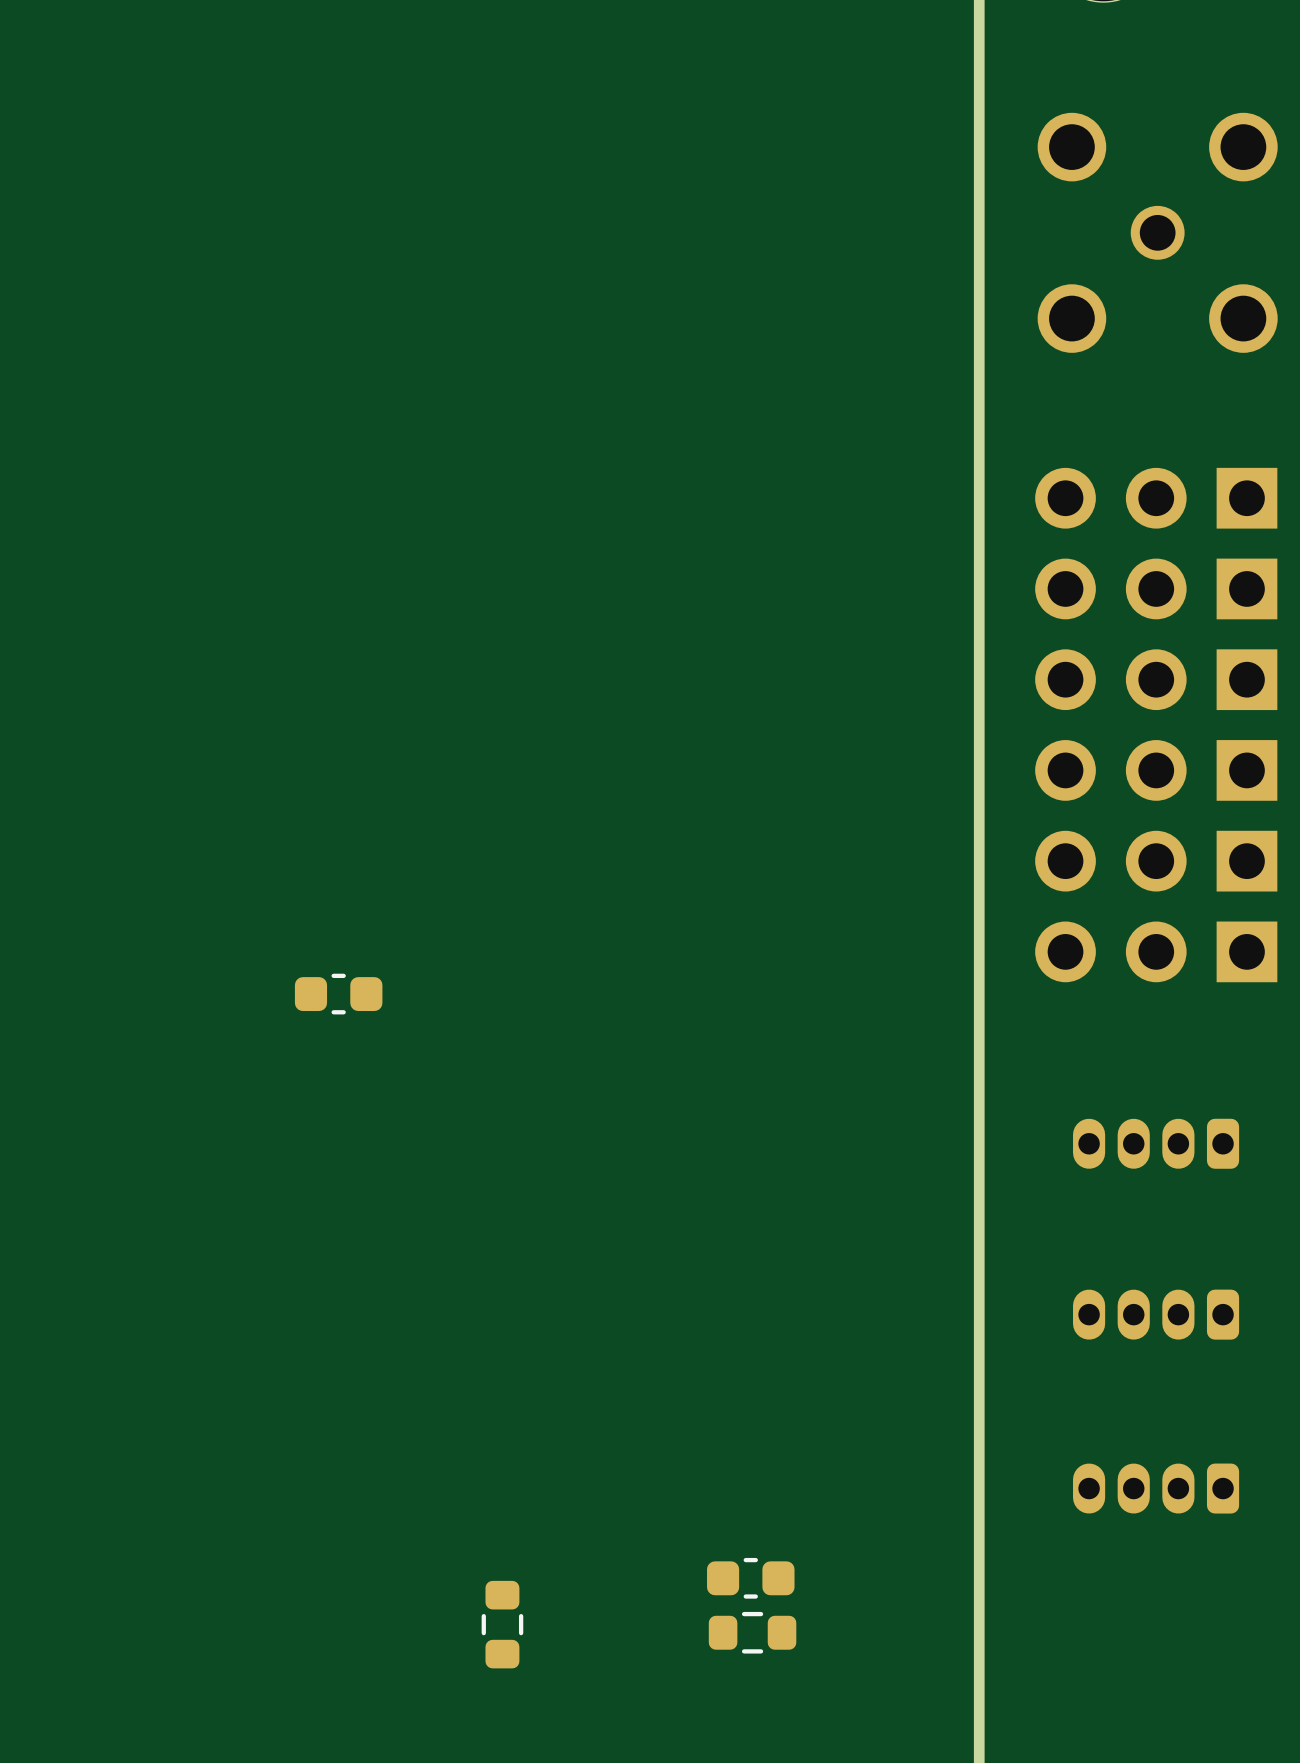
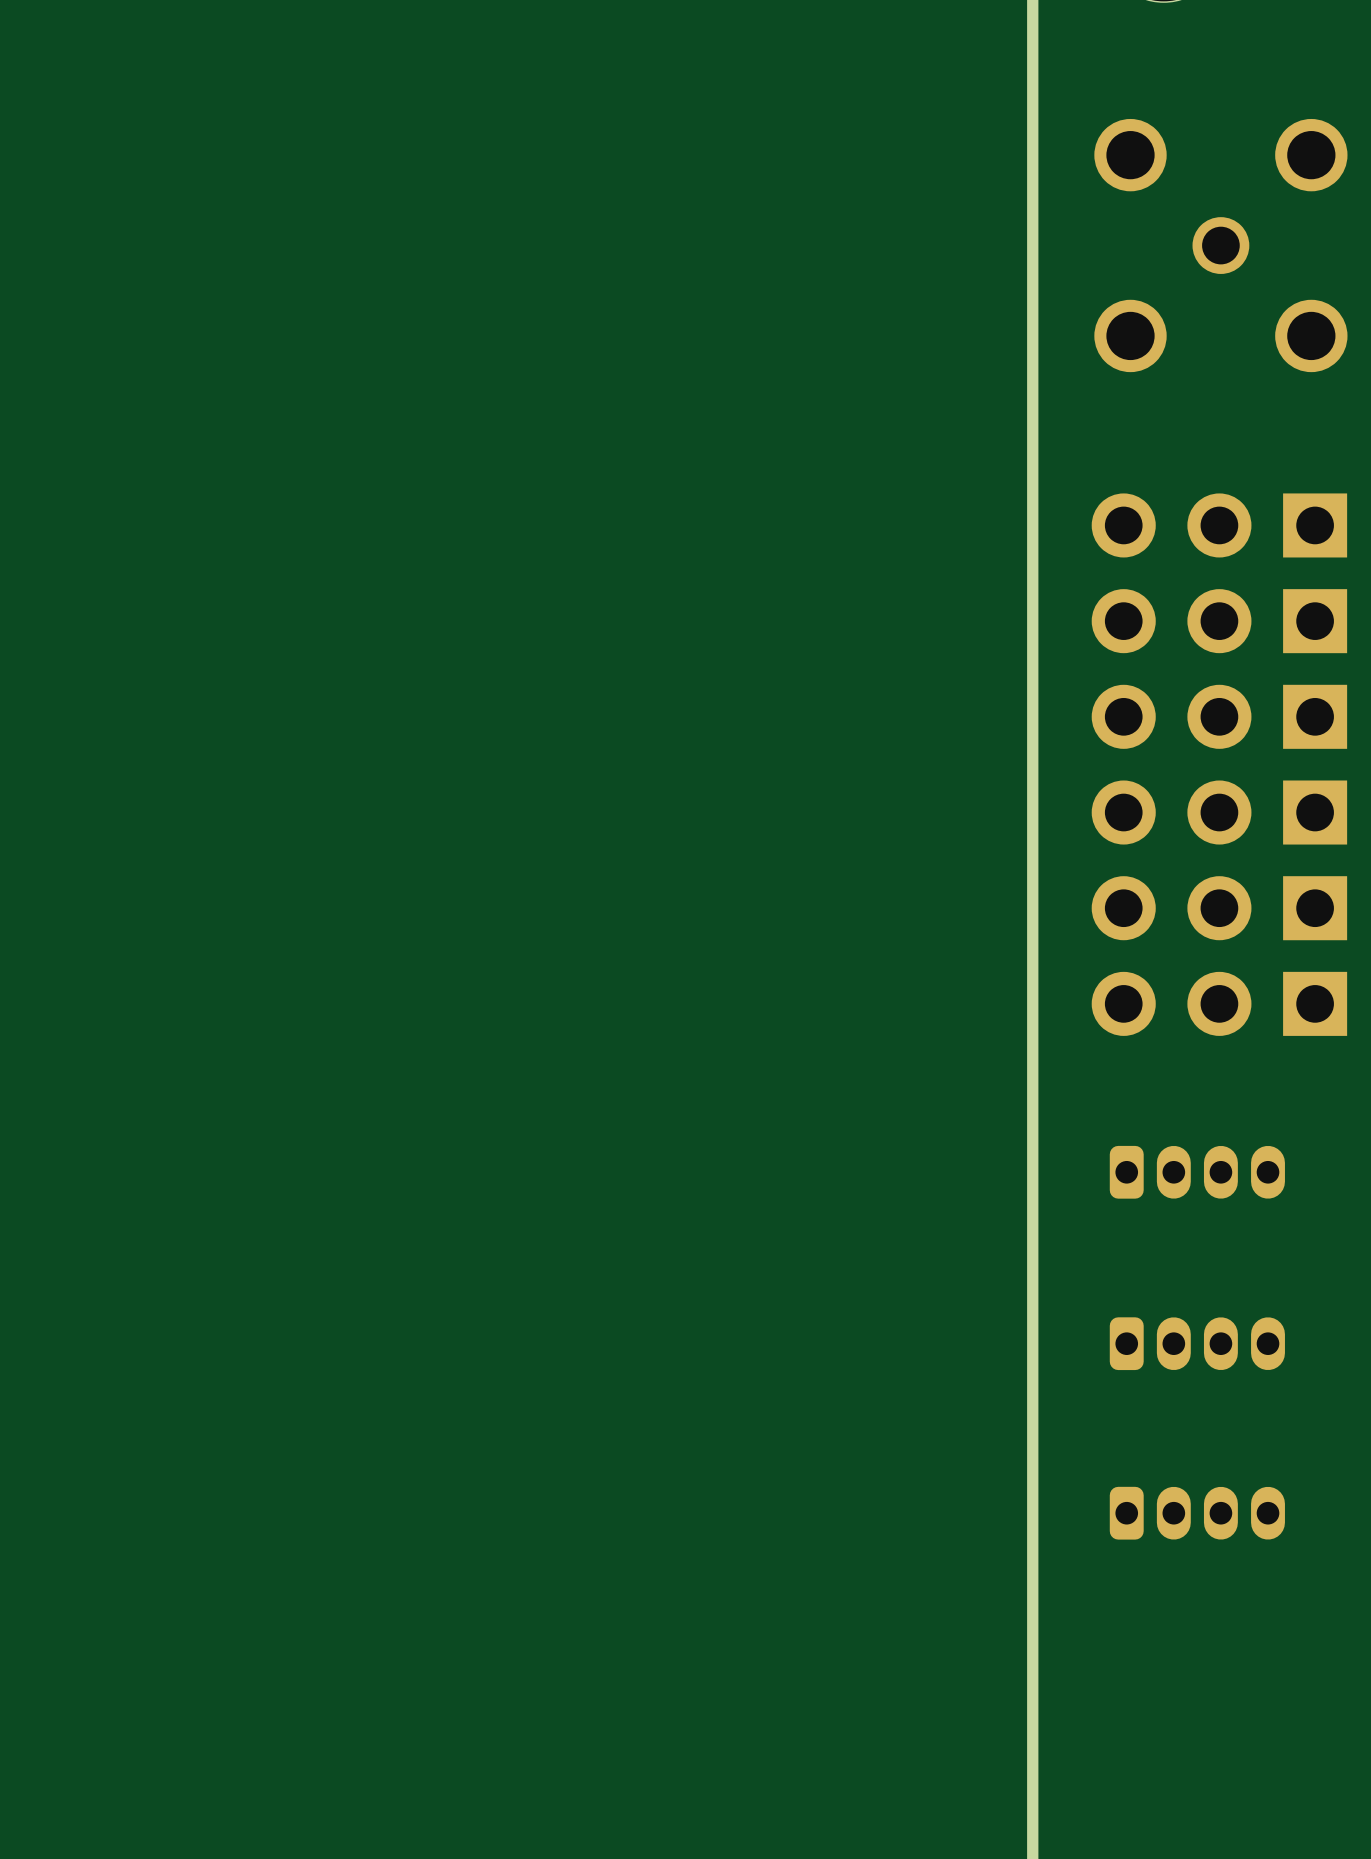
part: (338, 994) -> none
part rotation: 0° (1156, 1143) -> 180° (1197, 1172)
part rotation: 0° (1156, 1314) -> 180° (1197, 1343)
part rotation: 0° (1156, 1488) -> 180° (1197, 1513)
part: (750, 1578) -> none
part: (502, 1624) -> none
part: (752, 1632) -> none

